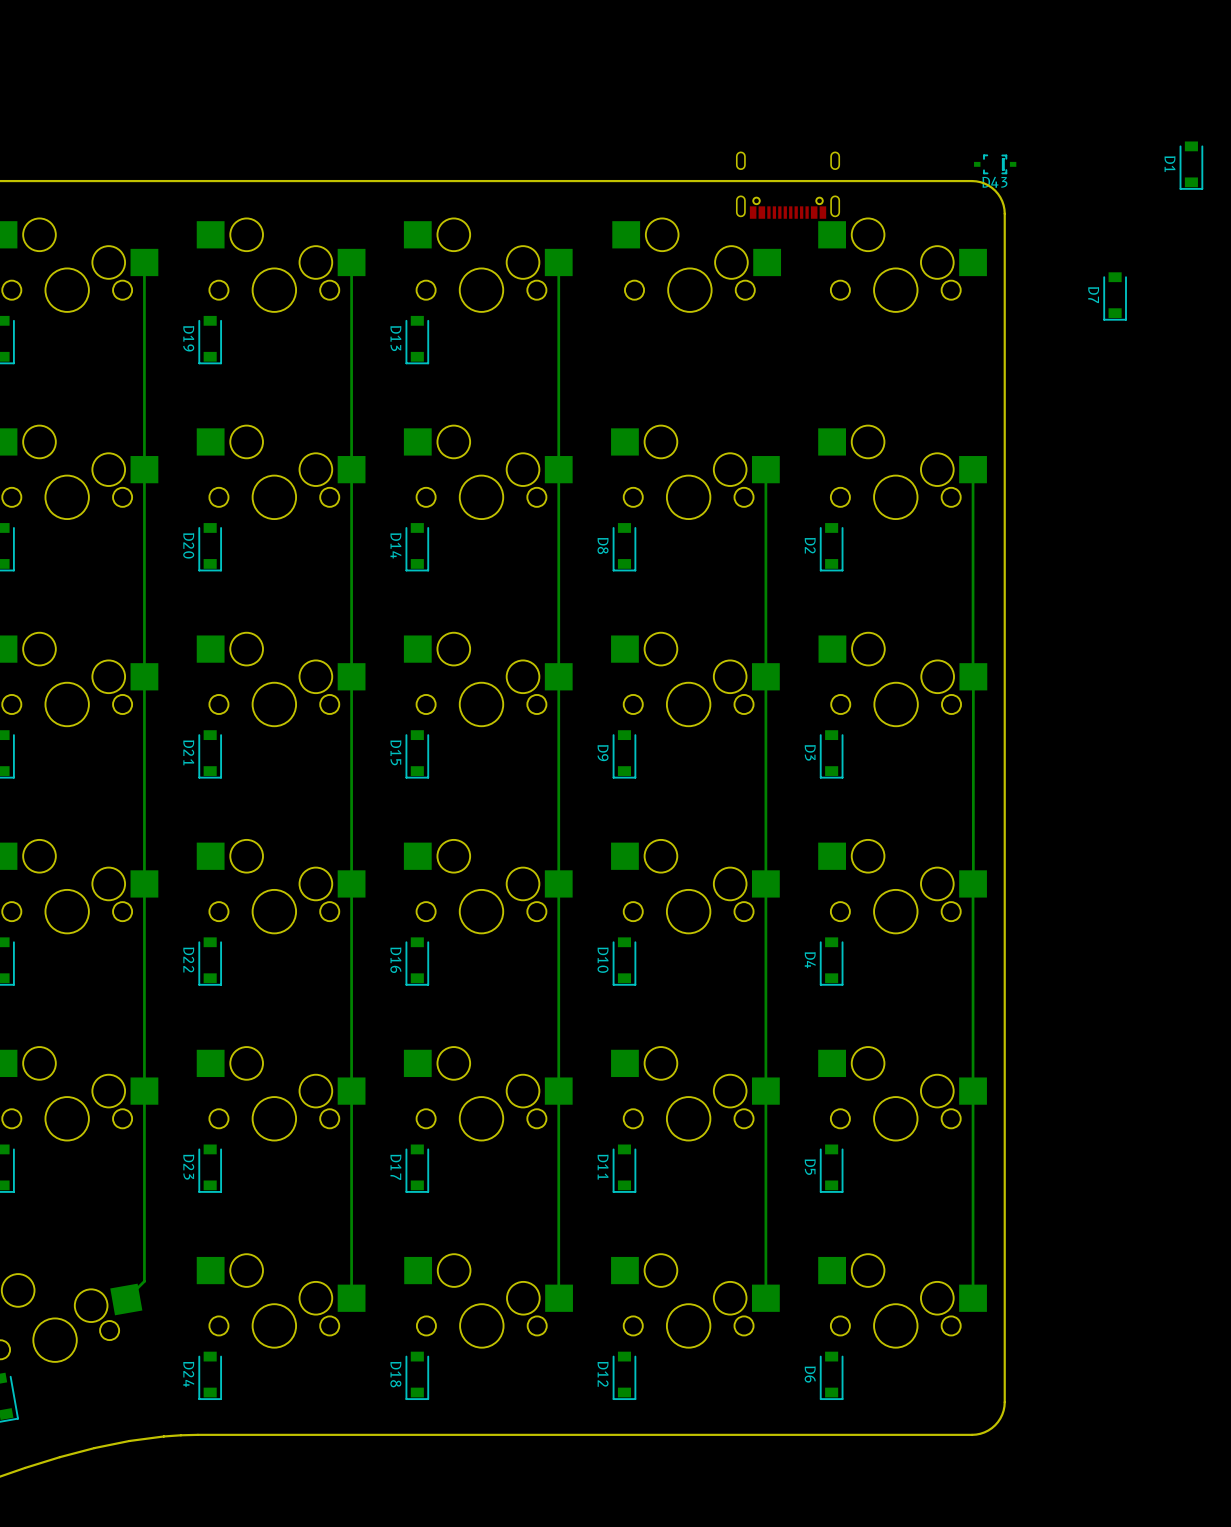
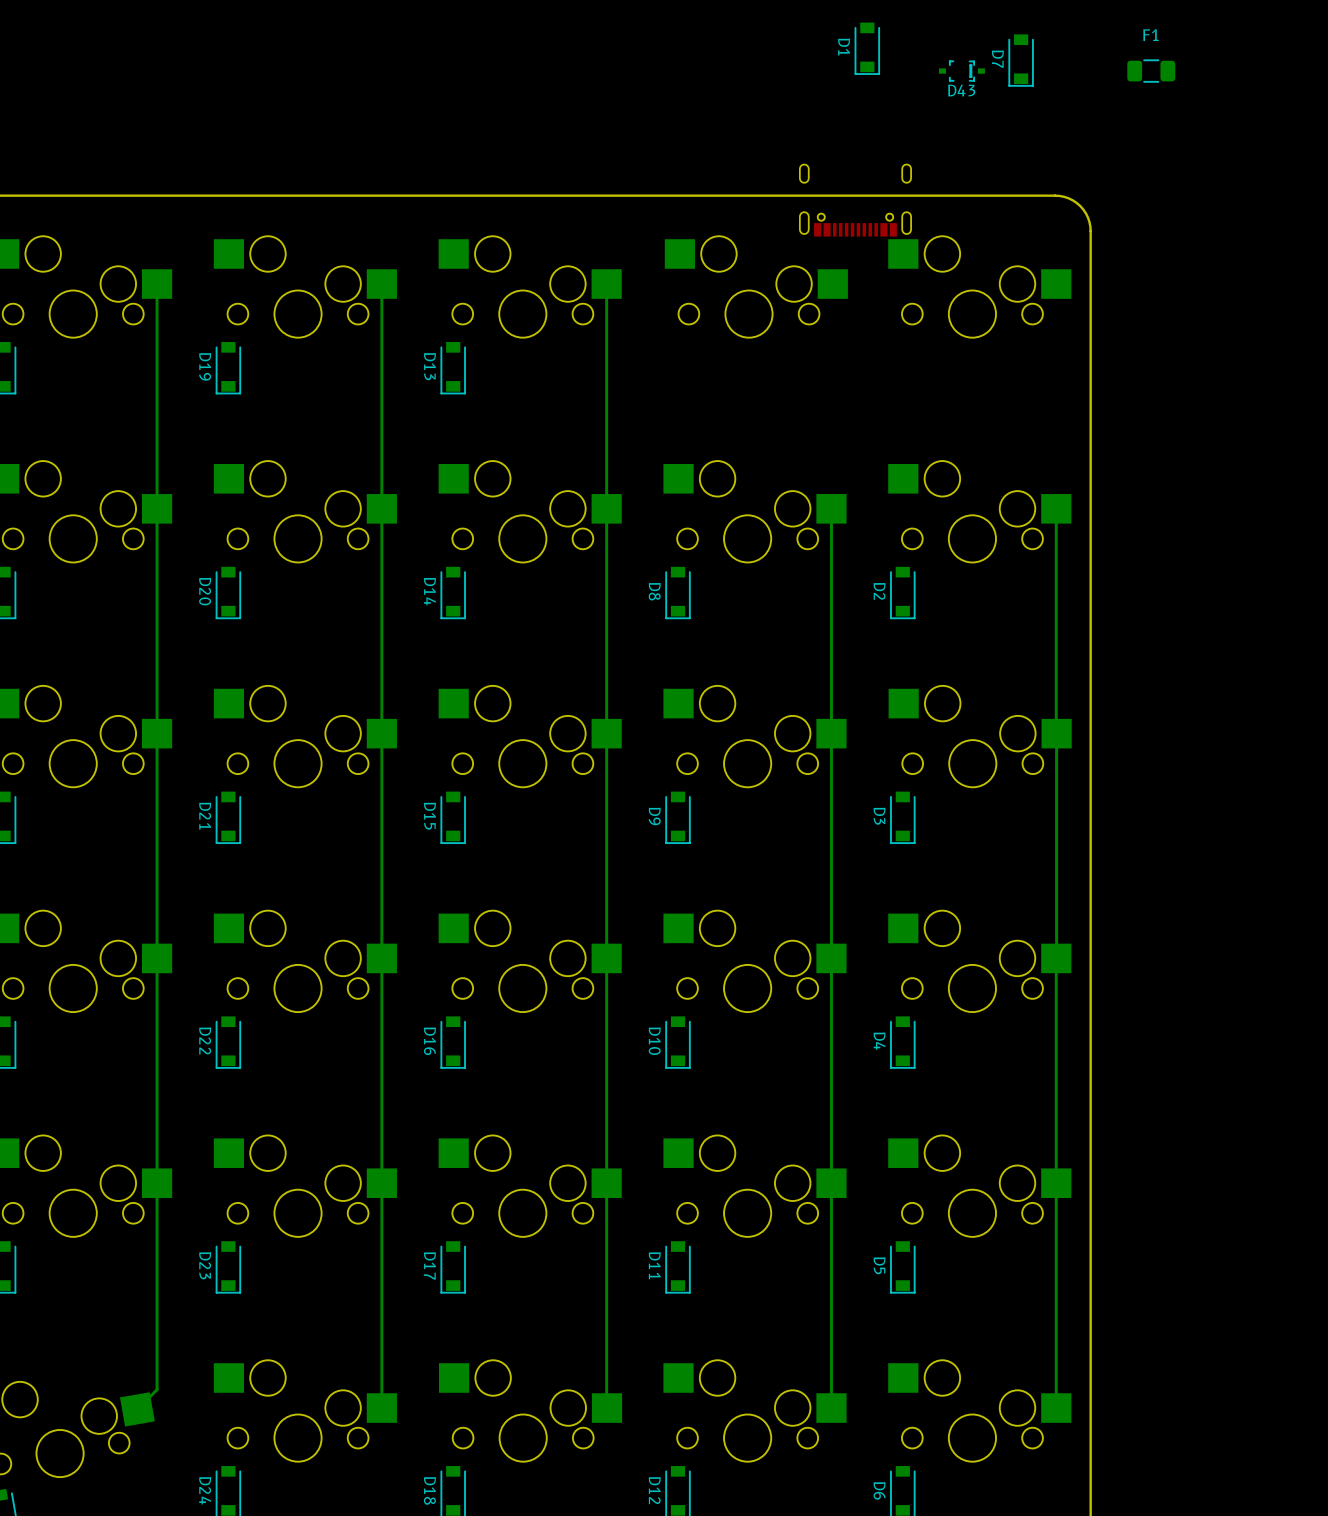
F1: none -> (1151, 71)
D43 position: (995, 164) -> (961, 71)
D1 position: (1191, 165) -> (867, 48)
D7 position: (1115, 296) -> (1021, 60)

